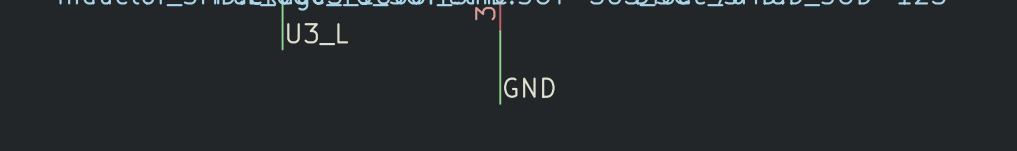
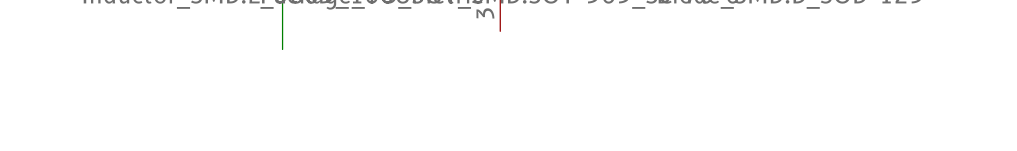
wire: (500, 31) (500, 103) -> none
label: U3_L (317, 34) -> none
label: GND (529, 87) -> none

